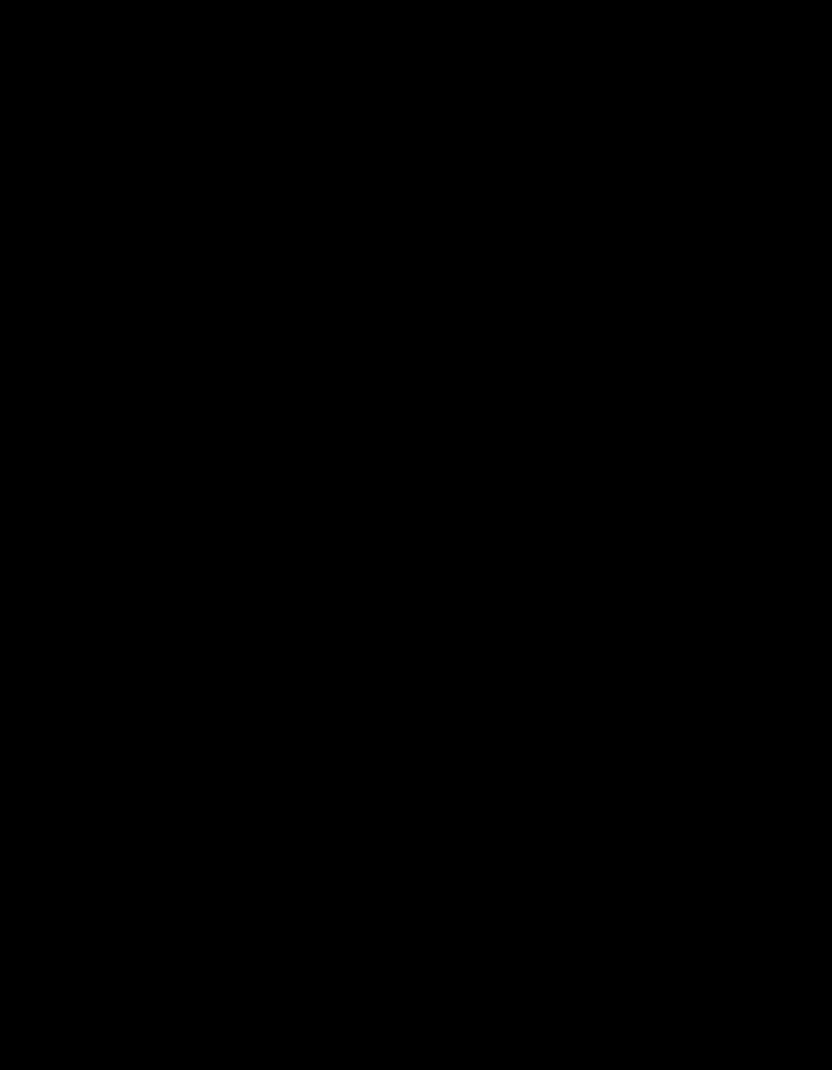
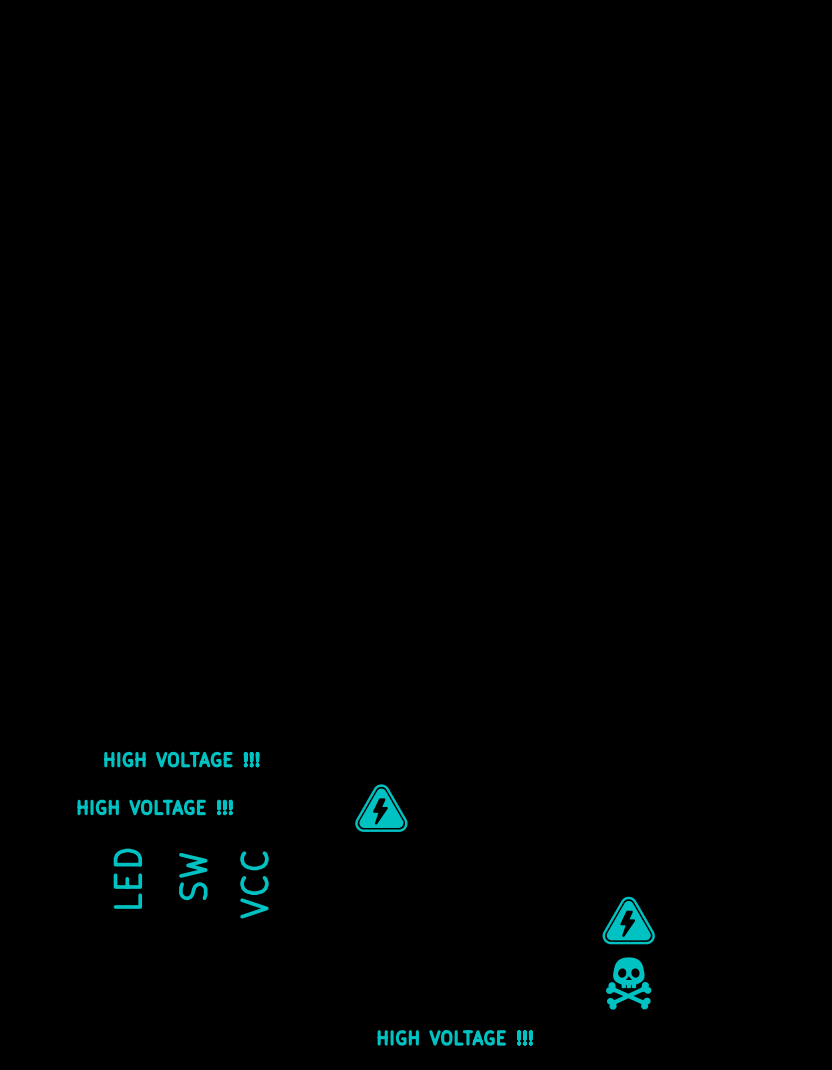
text: none -> HIGH VOLTAGE !!! (181, 759)
drawing: none -> [355, 784, 408, 832]
text: none -> HIGH VOLTAGE !!! (155, 807)
text: none -> SW (193, 876)
text: none -> LED (127, 878)
text: none -> VCC (254, 884)
drawing: none -> [602, 896, 655, 1010]
text: none -> HIGH VOLTAGE !!! (455, 1037)

